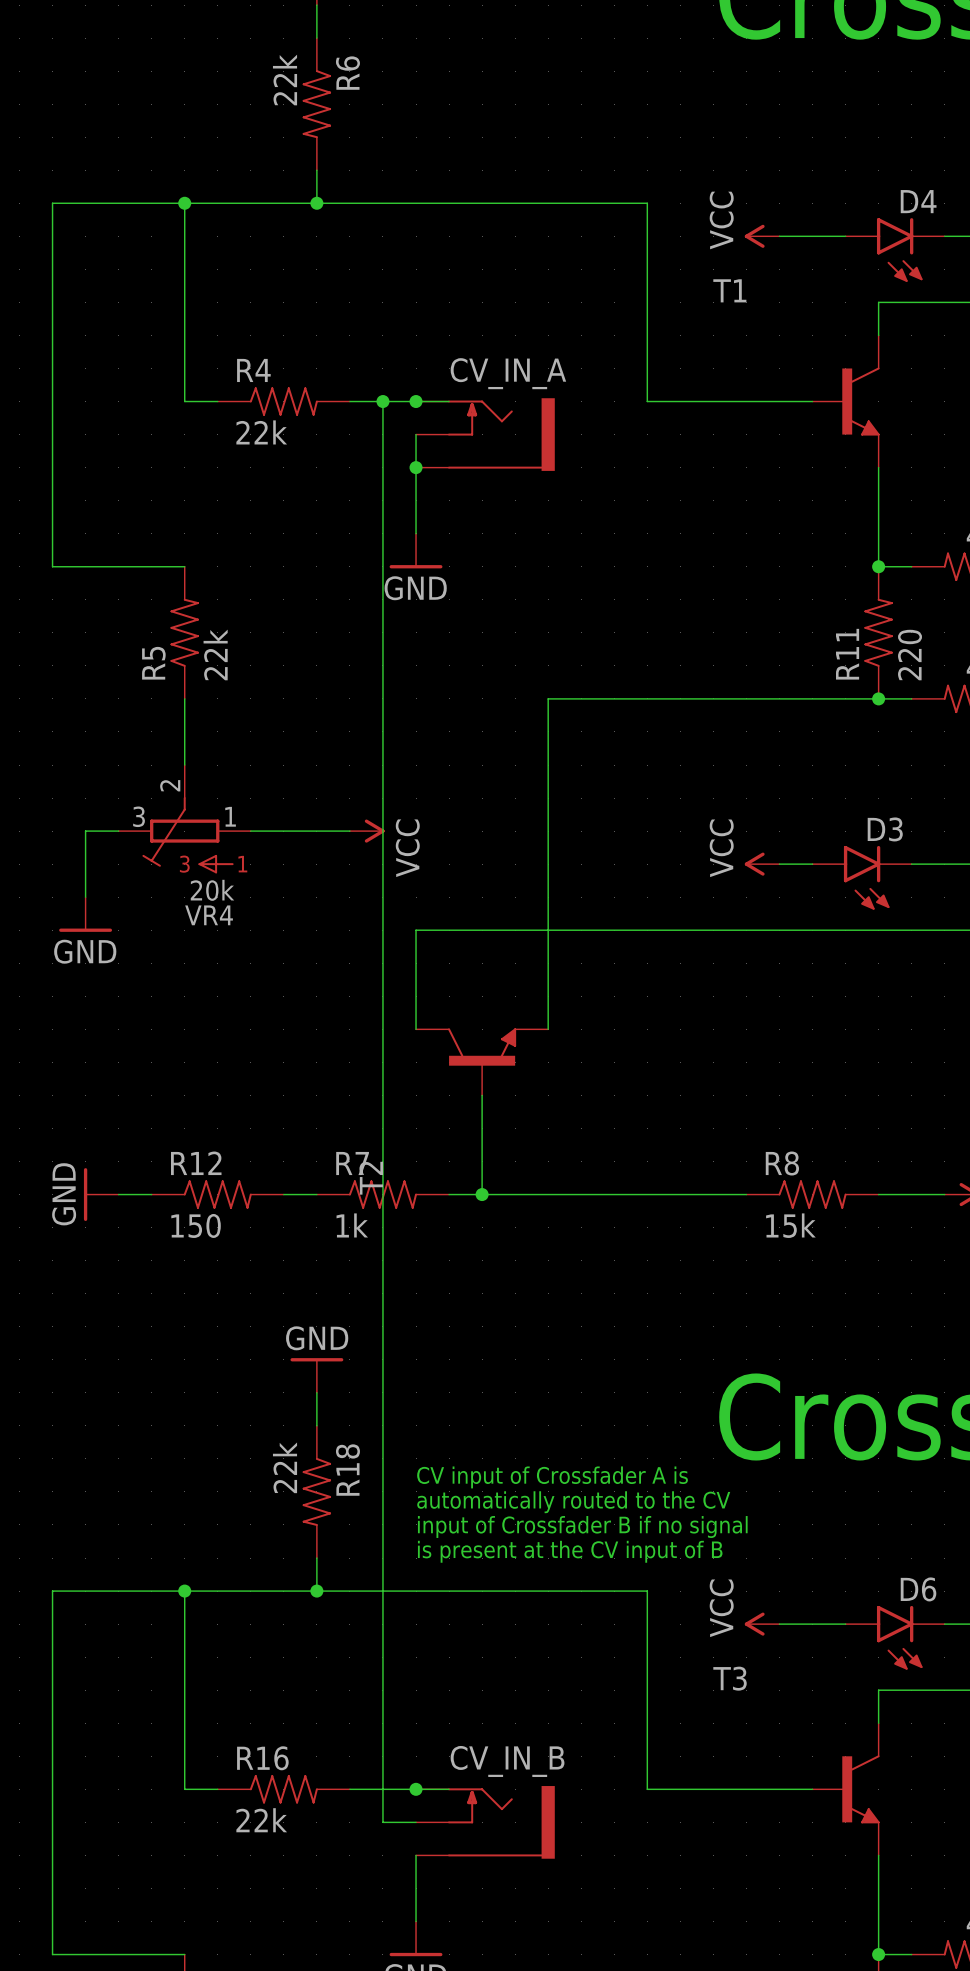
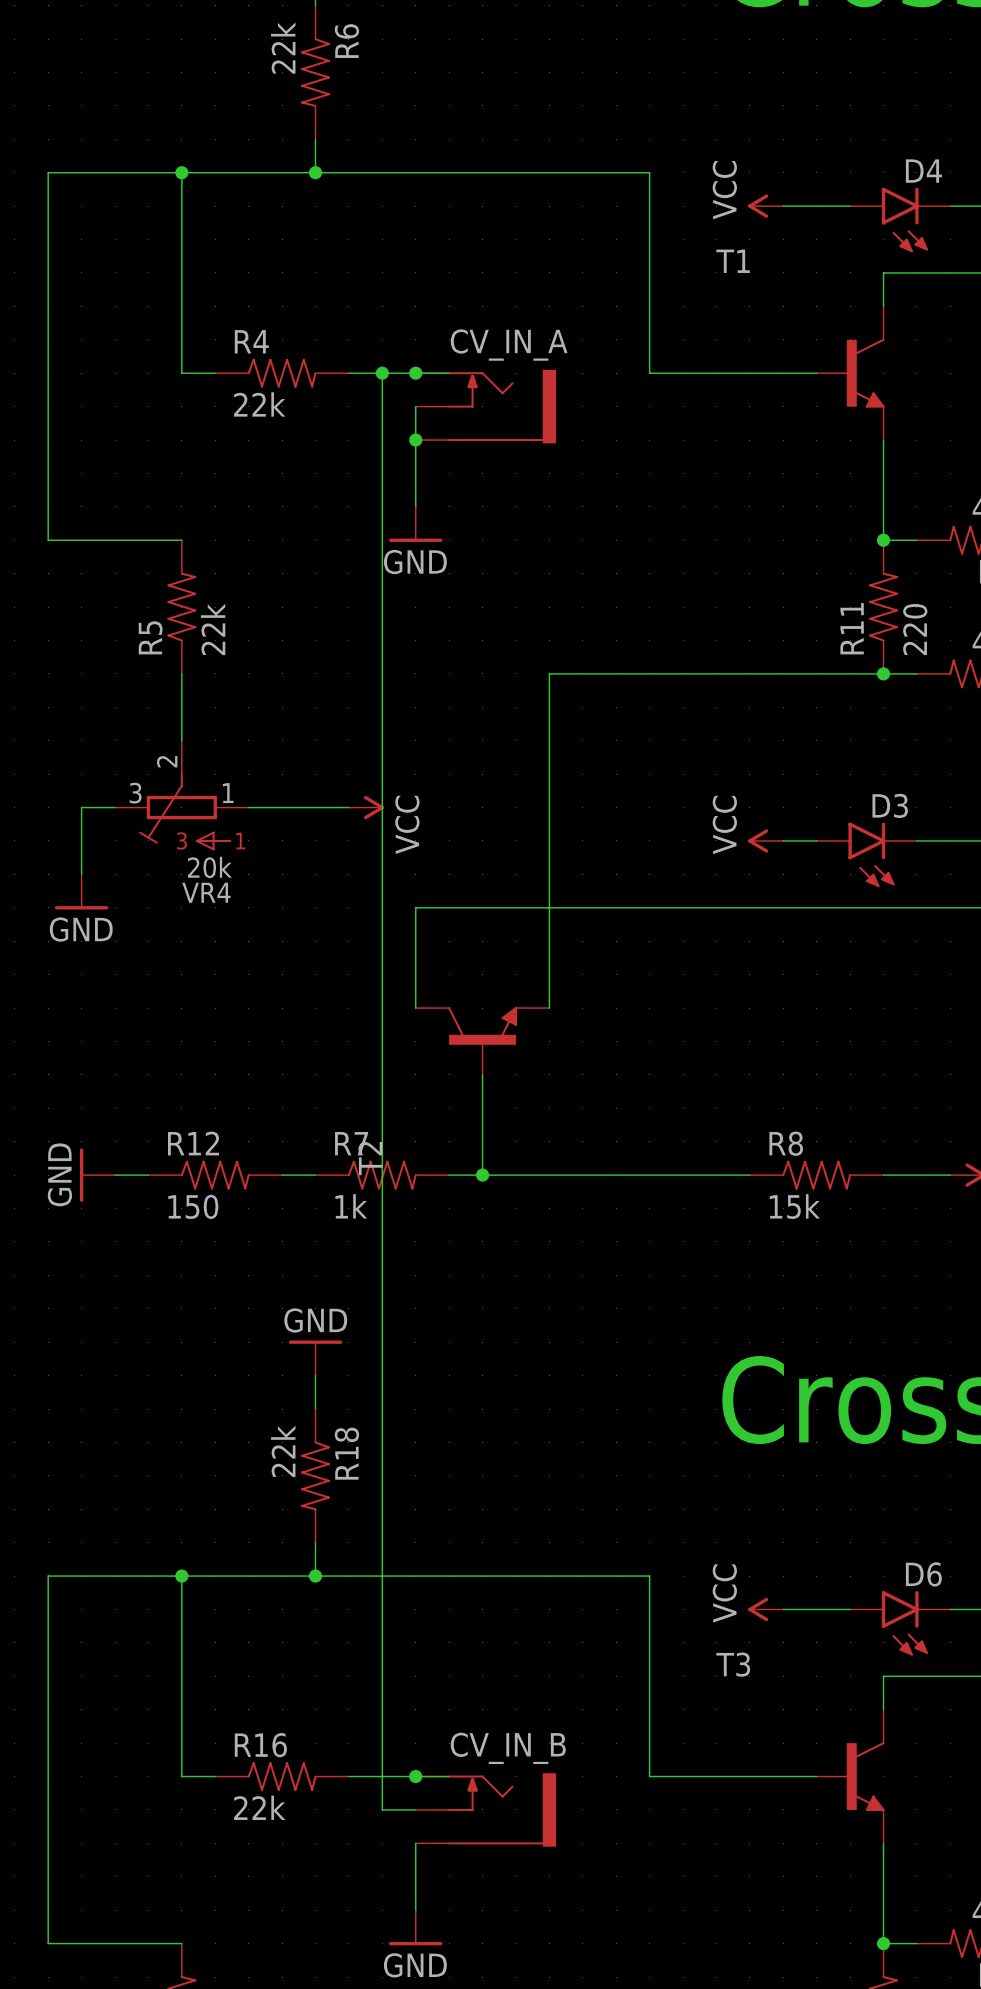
text: CV input of Crossfader A is (552, 1477) -> none
text: automatically routed to the CV (573, 1502) -> none
text: input of Crossfader B if no signal (582, 1526) -> none
text: is present at the CV input of B (570, 1551) -> none

